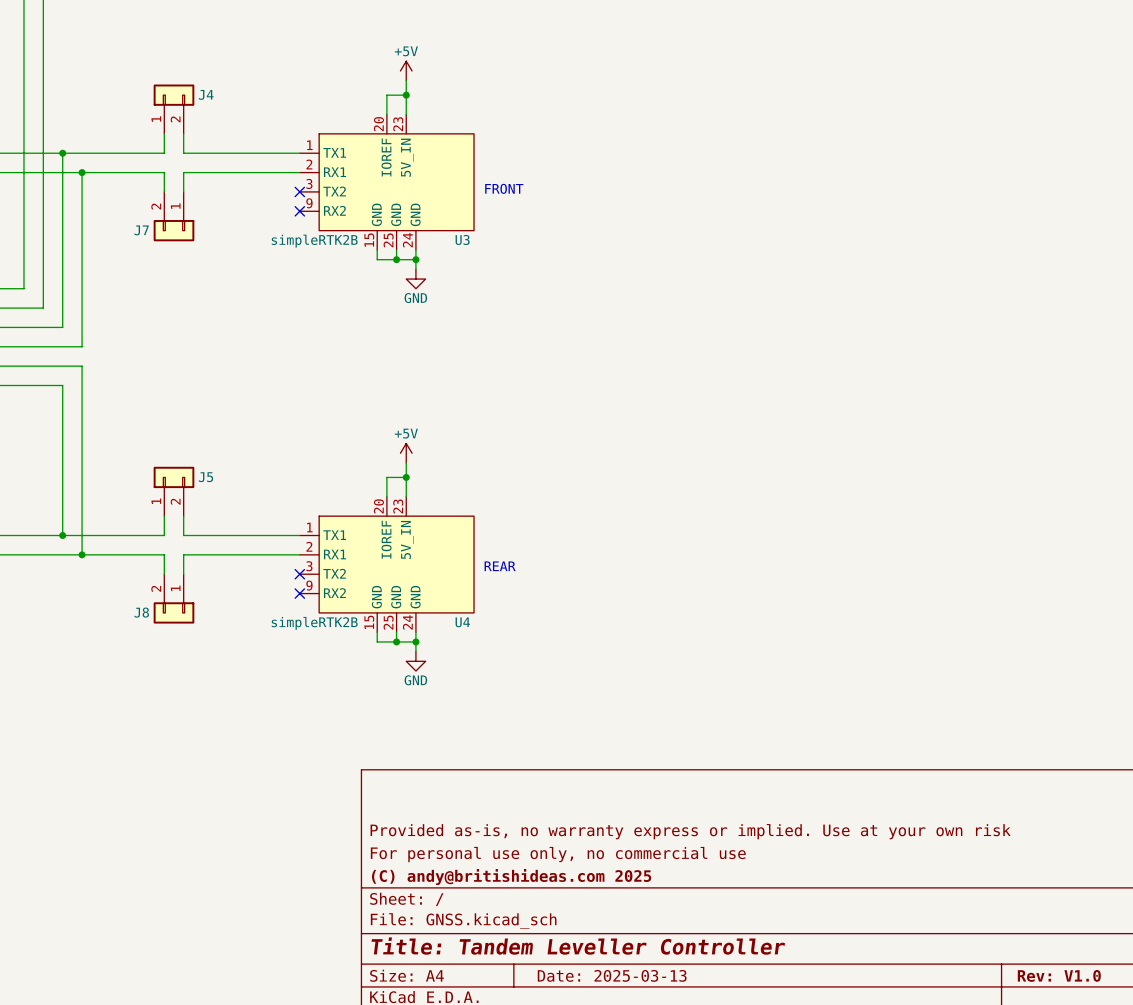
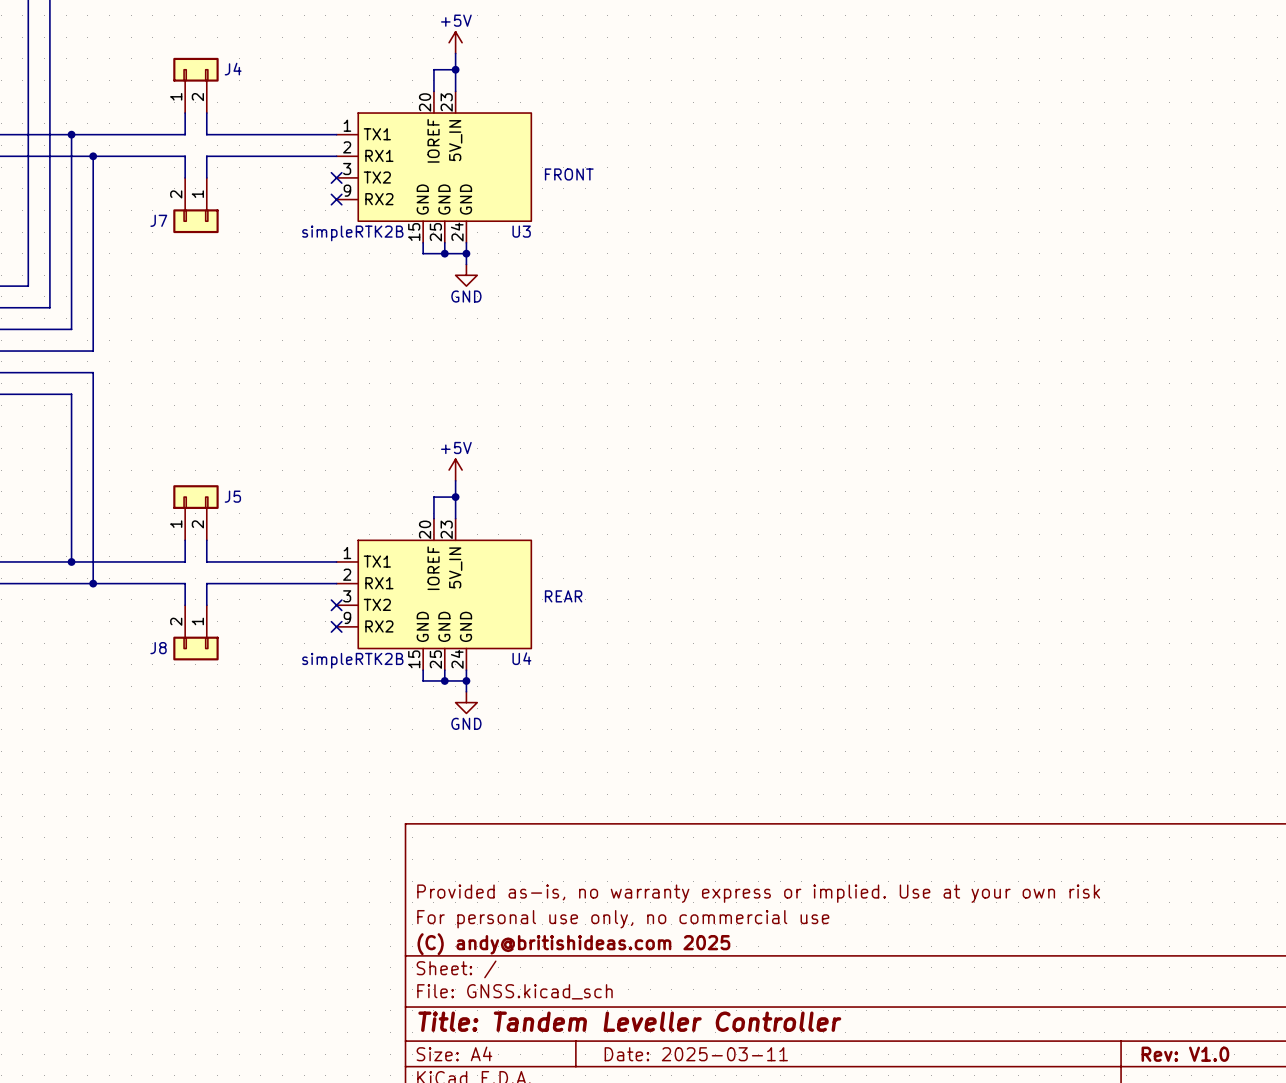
title block: Date: 2025-03-13 (612, 975) -> Date: 2025-03-11 (696, 1054)

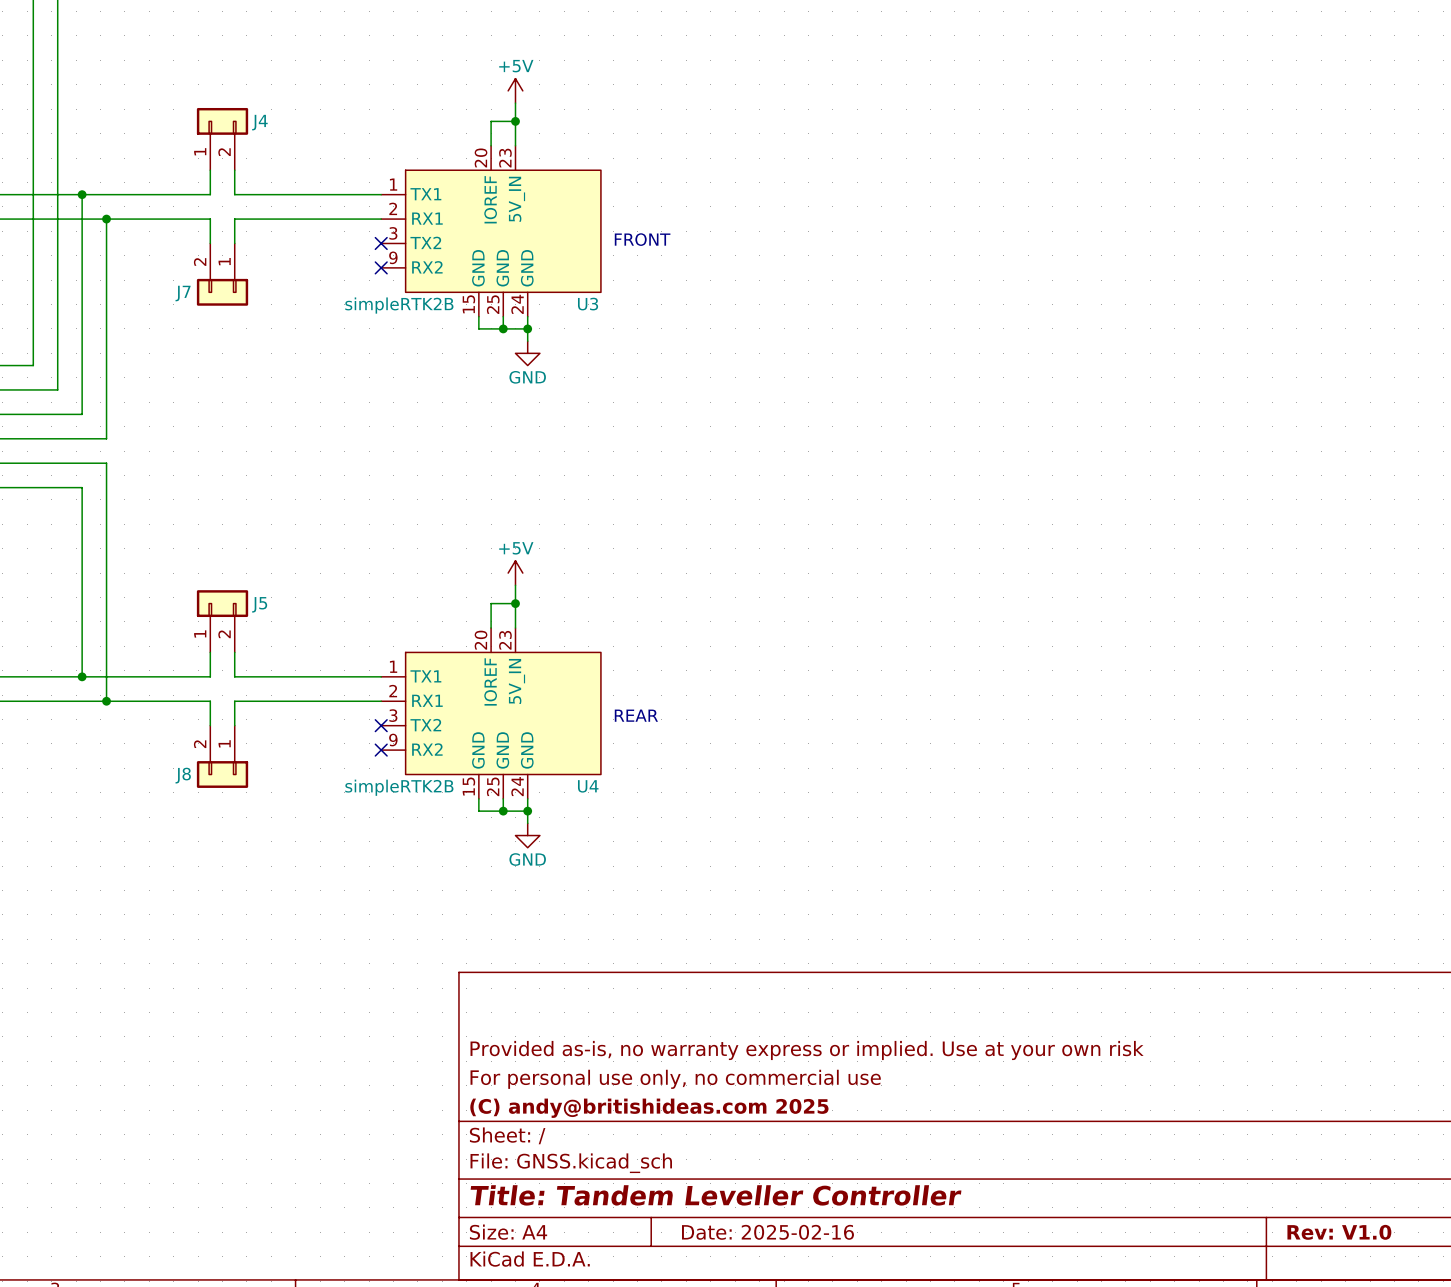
title block: Date: 2025-03-11 (696, 1054) -> Date: 2025-02-16 (767, 1232)

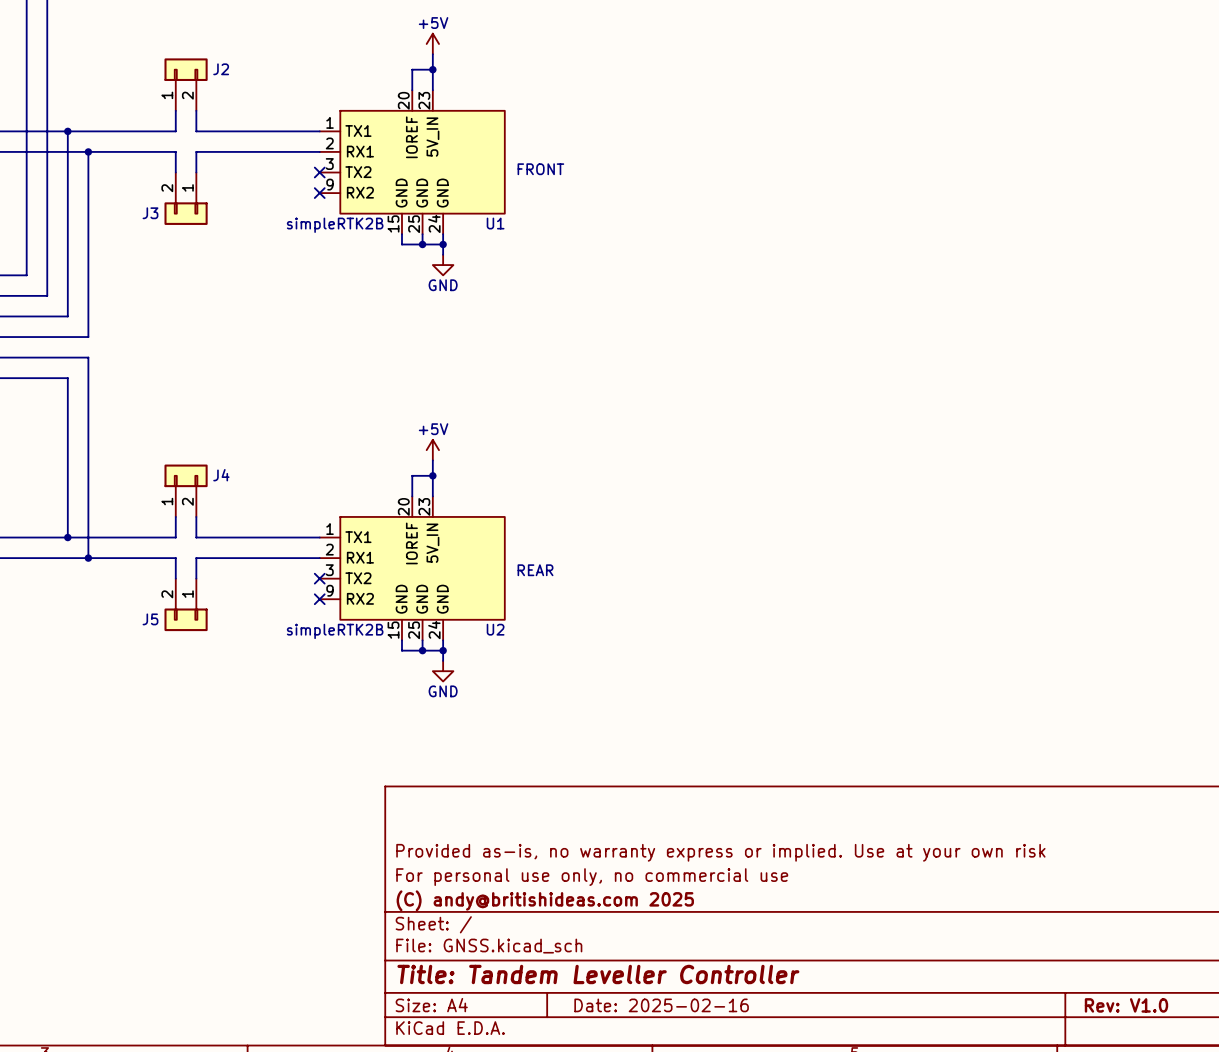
J4 name: J4 (259, 122) -> J2 (221, 69)
J7 name: J7 (183, 293) -> J3 (150, 213)
U3 name: U3 (588, 304) -> U1 (495, 223)
J5 name: J5 (259, 604) -> J4 (221, 475)
J8 name: J8 (183, 775) -> J5 (150, 619)
U4 name: U4 (588, 786) -> U2 (495, 629)

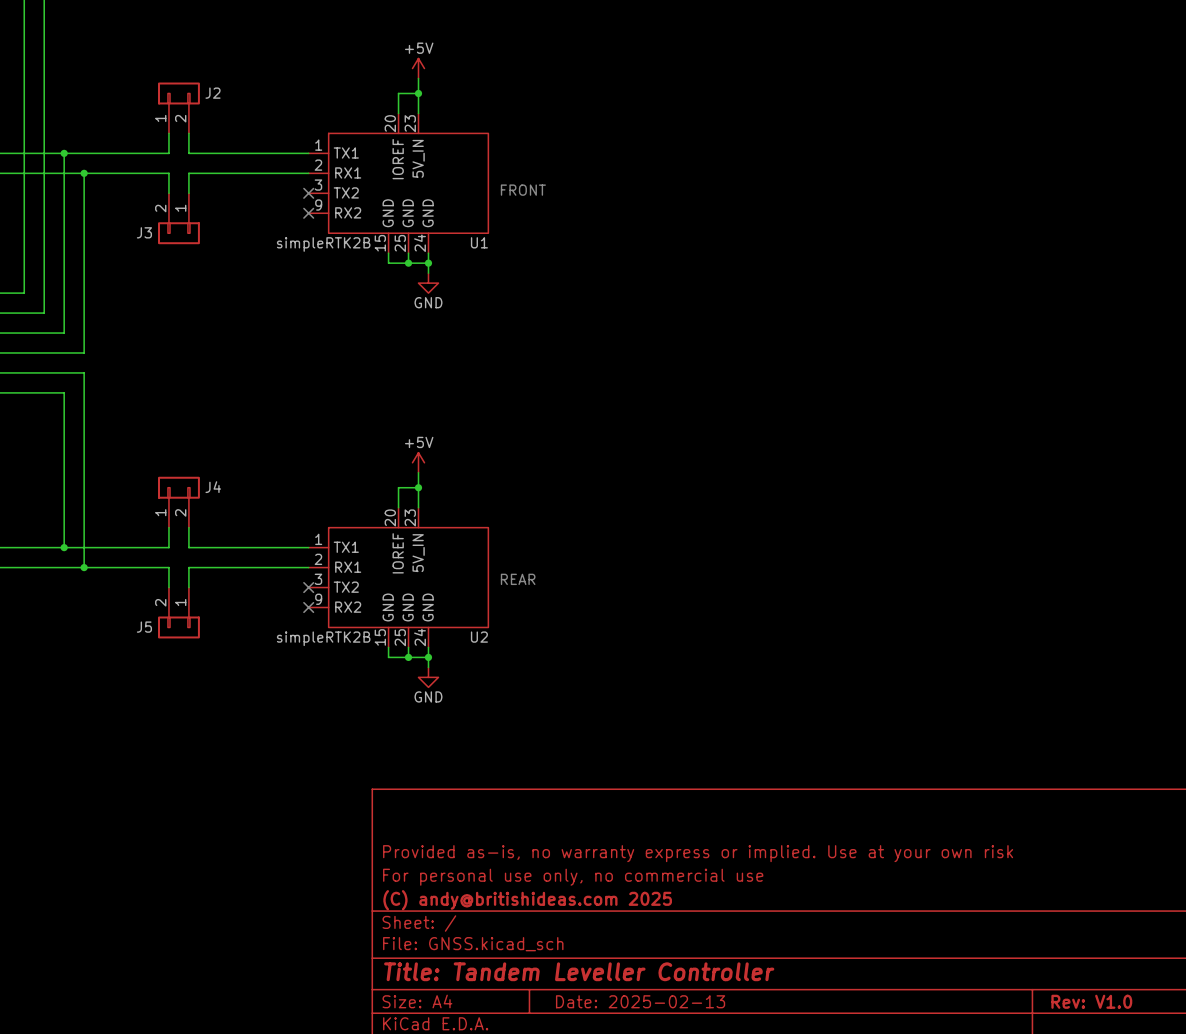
title block: Date: 2025-02-16 (661, 1005) -> Date: 2025-02-13 (640, 1001)

